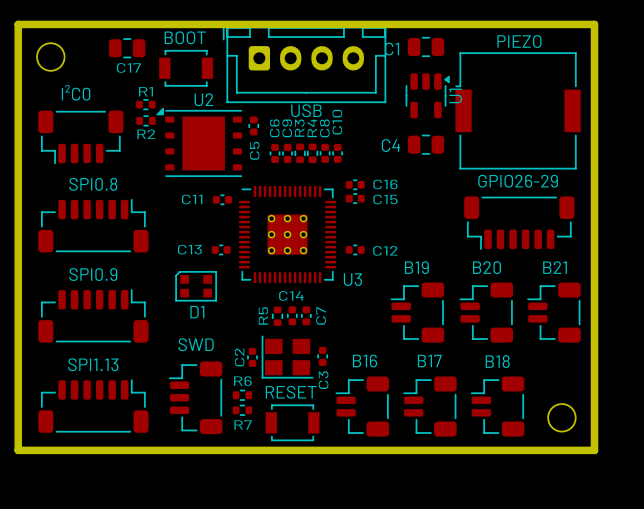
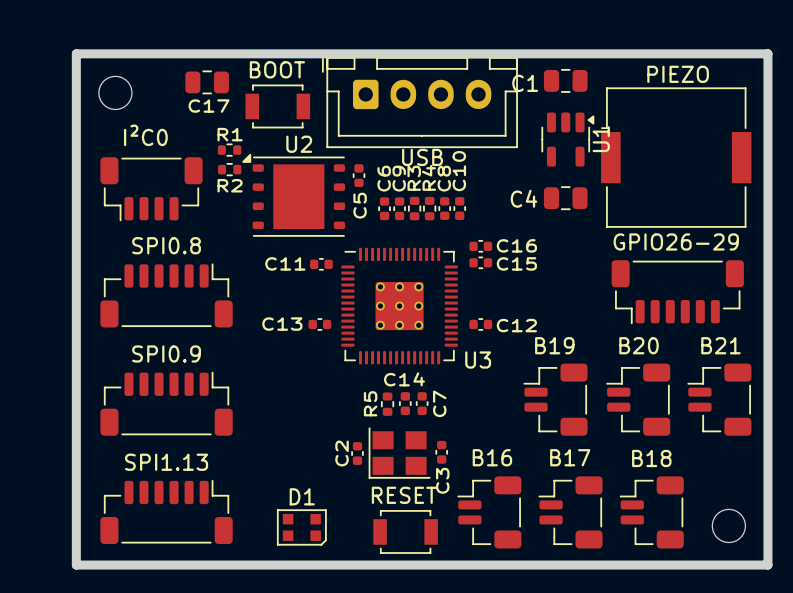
D1 rotation: 0° (196, 286) -> 180° (301, 527)
D1 position: (196, 286) -> (301, 527)
R6: (242, 395) -> none
part: SWD (195, 397) -> none
R7: (242, 410) -> none

